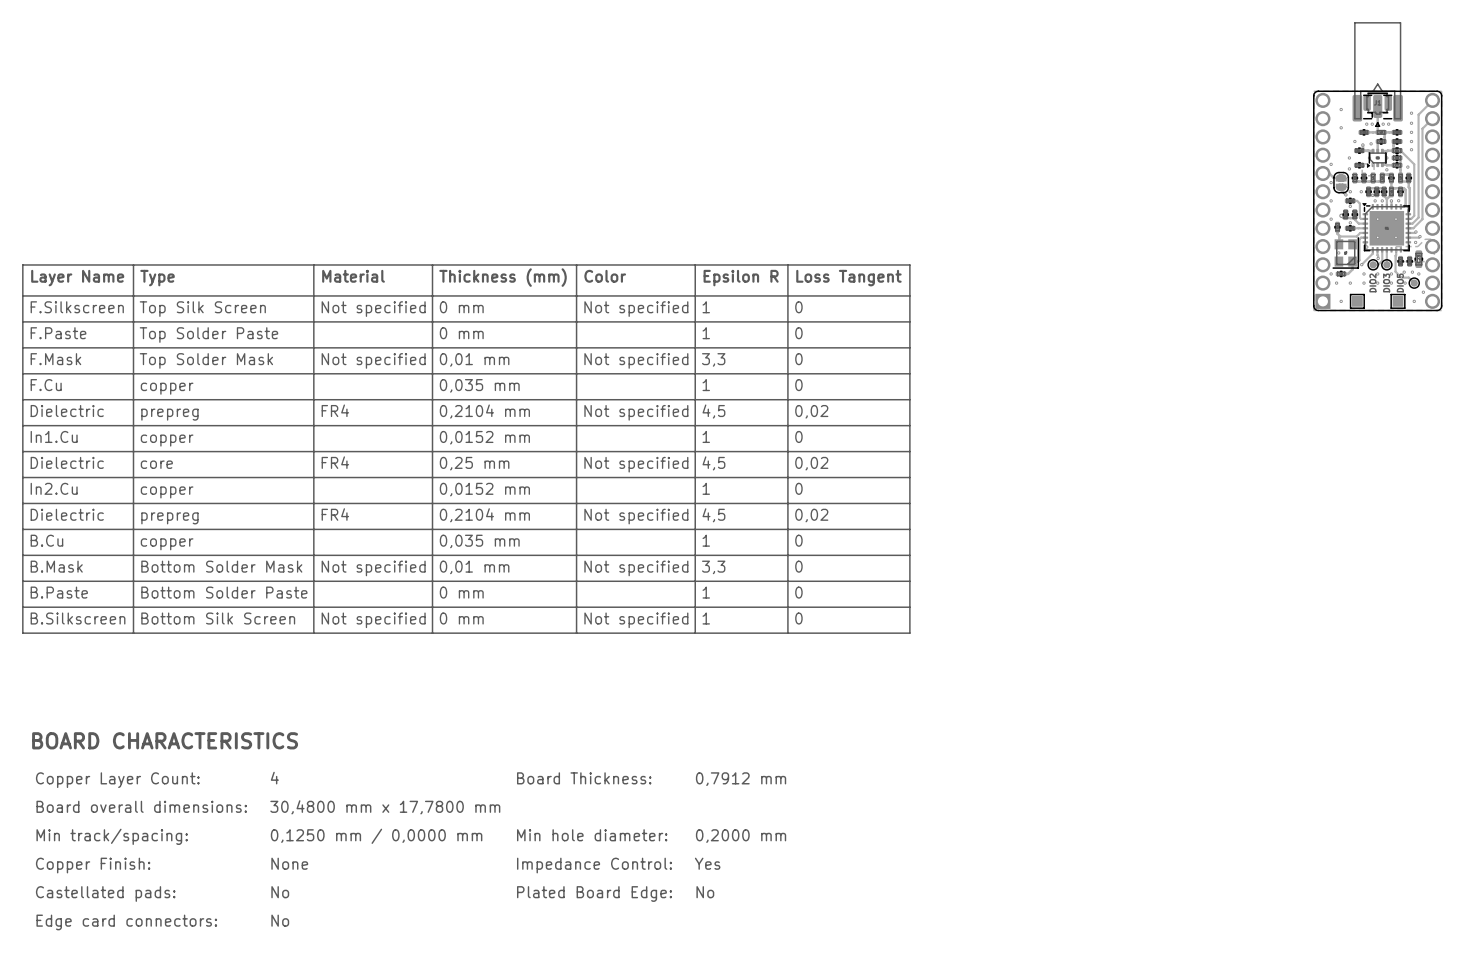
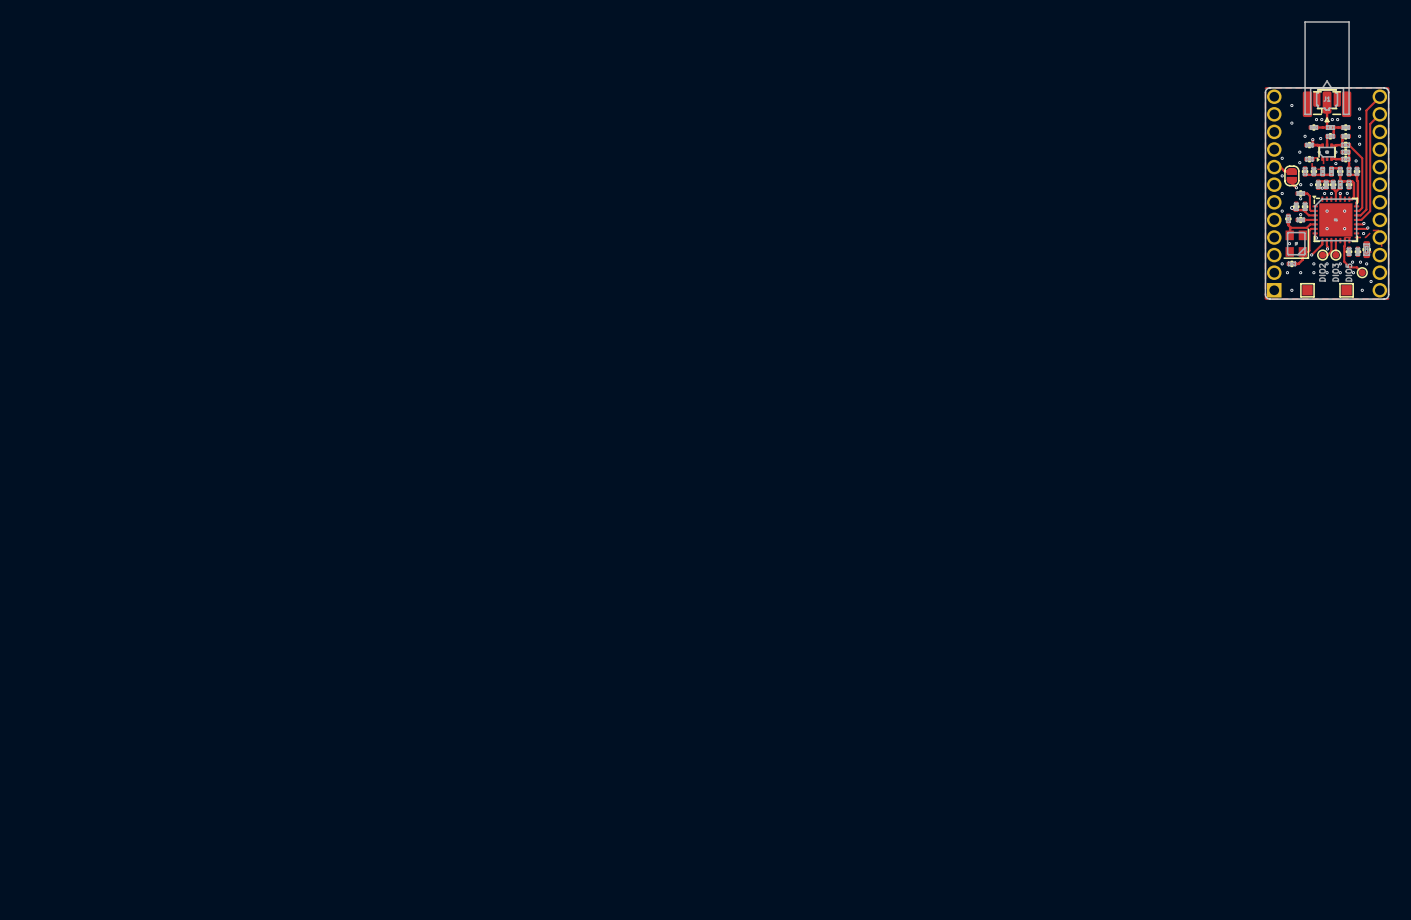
line: (22, 264) (909, 264) (909, 633) (22, 633) (22, 264) -> none
line: (133, 264) (133, 633) -> none
line: (313, 264) (313, 633) -> none
line: (432, 264) (432, 633) -> none
line: (576, 264) (576, 633) -> none
line: (695, 264) (695, 633) -> none
line: (787, 264) (787, 633) -> none
text: Material (353, 276) -> none
text: Color (605, 276) -> none
text: Thickness (mm) (503, 277) -> none
text: Layer Name (77, 278) -> none
text: Type (157, 278) -> none
text: Epsilon R (741, 278) -> none
text: Loss Tangent (848, 278) -> none
line: (22, 295) (909, 295) -> none
text: F.Silkscreen (77, 307) -> none
text: 0 mm (461, 307) -> none
text: 1 (706, 307) -> none
text: 0 (798, 307) -> none
text: Top Silk Screen (202, 309) -> none
text: Not specified (373, 309) -> none
text: Not specified (636, 309) -> none
line: (22, 321) (909, 321) -> none
text: F.Paste (58, 333) -> none
text: 0 mm (461, 333) -> none
text: 1 (706, 333) -> none
text: 0 (798, 333) -> none
text: Top Solder Paste (208, 335) -> none
line: (22, 347) (909, 347) -> none
text: F.Mask (55, 359) -> none
text: 0,01 mm (474, 359) -> none
text: 3,3 (713, 359) -> none
text: 0 (798, 359) -> none
text: Top Solder Mask (206, 360) -> none
text: Not specified (373, 360) -> none
text: Not specified (636, 360) -> none
line: (22, 373) (909, 373) -> none
text: F.Cu (46, 385) -> none
text: 0,035 mm (479, 385) -> none
text: 1 (706, 385) -> none
text: 0 (798, 385) -> none
text: copper (167, 388) -> none
line: (22, 399) (909, 399) -> none
text: FR4 (335, 410) -> none
text: Dielectric (67, 411) -> none
text: 0,2104 mm (484, 411) -> none
text: 4,5 (713, 411) -> none
text: 0,02 (811, 411) -> none
text: Not specified (636, 412) -> none
text: prepreg (169, 414) -> none
line: (22, 425) (909, 425) -> none
text: In1.Cu (54, 436) -> none
text: 1 (706, 436) -> none
text: 0 (798, 436) -> none
text: 0,0152 mm (484, 437) -> none
text: copper (167, 440) -> none
line: (22, 451) (909, 451) -> none
text: Dielectric (67, 462) -> none
text: FR4 (335, 462) -> none
text: 0,25 mm (474, 463) -> none
text: 4,5 (713, 463) -> none
text: 0,02 (811, 463) -> none
text: core (156, 464) -> none
text: Not specified (636, 464) -> none
line: (22, 477) (909, 477) -> none
text: In2.Cu (54, 488) -> none
text: 1 (706, 488) -> none
text: 0 (798, 488) -> none
text: 0,0152 mm (484, 489) -> none
text: copper (167, 492) -> none
line: (22, 503) (909, 503) -> none
text: Dielectric (67, 514) -> none
text: FR4 (335, 514) -> none
text: 0,2104 mm (484, 515) -> none
text: 4,5 (713, 515) -> none
text: 0,02 (811, 515) -> none
text: Not specified (636, 516) -> none
text: prepreg (169, 518) -> none
line: (22, 529) (909, 529) -> none
text: B.Cu (46, 540) -> none
text: 1 (706, 540) -> none
text: 0 (798, 540) -> none
text: 0,035 mm (479, 541) -> none
text: copper (167, 544) -> none
line: (22, 555) (909, 555) -> none
text: B.Mask (56, 566) -> none
text: Bottom Solder Mask (221, 566) -> none
text: 0 (798, 566) -> none
text: 0,01 mm (474, 567) -> none
text: 3,3 (713, 567) -> none
text: Not specified (373, 568) -> none
text: Not specified (636, 568) -> none
line: (22, 581) (909, 581) -> none
text: B.Paste (59, 592) -> none
text: Bottom Solder Paste (224, 592) -> none
text: 0 mm (461, 592) -> none
text: 1 (706, 592) -> none
text: 0 (798, 592) -> none
line: (22, 607) (909, 607) -> none
text: B.Silkscreen (78, 618) -> none
text: Bottom Silk Screen (218, 618) -> none
text: 0 mm (461, 618) -> none
text: 1 (706, 618) -> none
text: 0 (798, 618) -> none
text: Not specified (373, 620) -> none
text: Not specified (636, 620) -> none
text: BOARD CHARACTERISTICS (165, 740) -> none
text: 4 (274, 778) -> none
text: Board Thickness: (584, 778) -> none
text: 0,7912 mm (741, 779) -> none
text: Copper Layer Count: (117, 780) -> none
text: Board overall dimensions: (141, 806) -> none
text: 30,4800 mm x 17,7800 mm (385, 807) -> none
text: Min hole diameter: (592, 835) -> none
text: Min track/spacing: (112, 836) -> none
text: 0,1250 mm / 0,0000 mm (376, 836) -> none
text: 0,2000 mm (741, 836) -> none
text: None (289, 863) -> none
text: Yes (707, 863) -> none
text: Copper Finish: (93, 865) -> none
text: Impedance Control: (594, 865) -> none
text: No (280, 892) -> none
text: No (705, 892) -> none
text: Castellated pads: (105, 893) -> none
text: Plated Board Edge: (594, 893) -> none
text: No (280, 920) -> none
text: Edge card connectors: (126, 922) -> none

